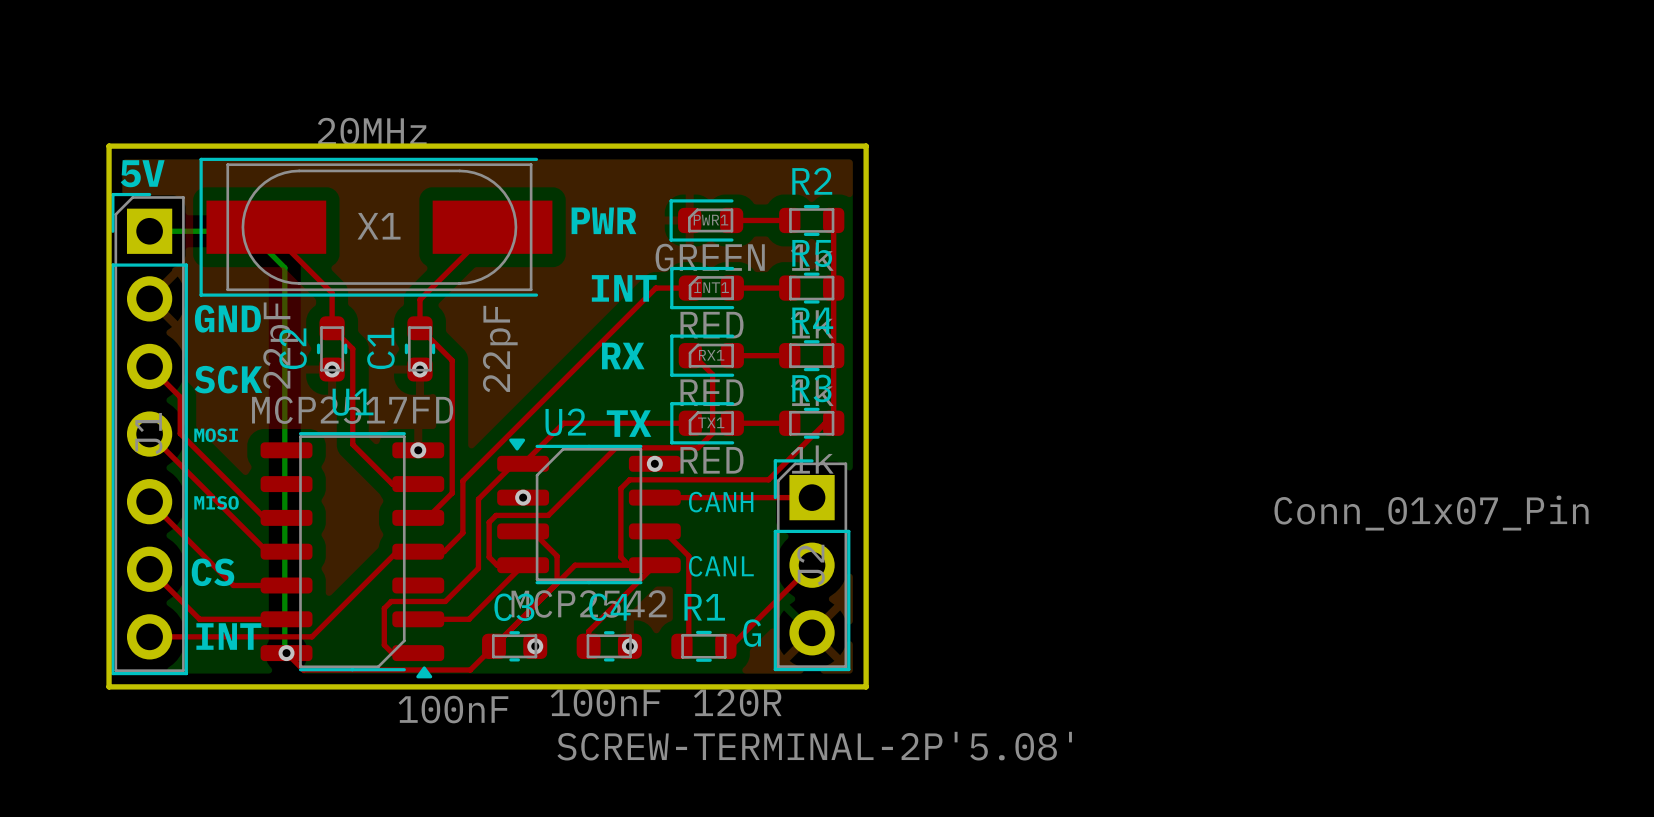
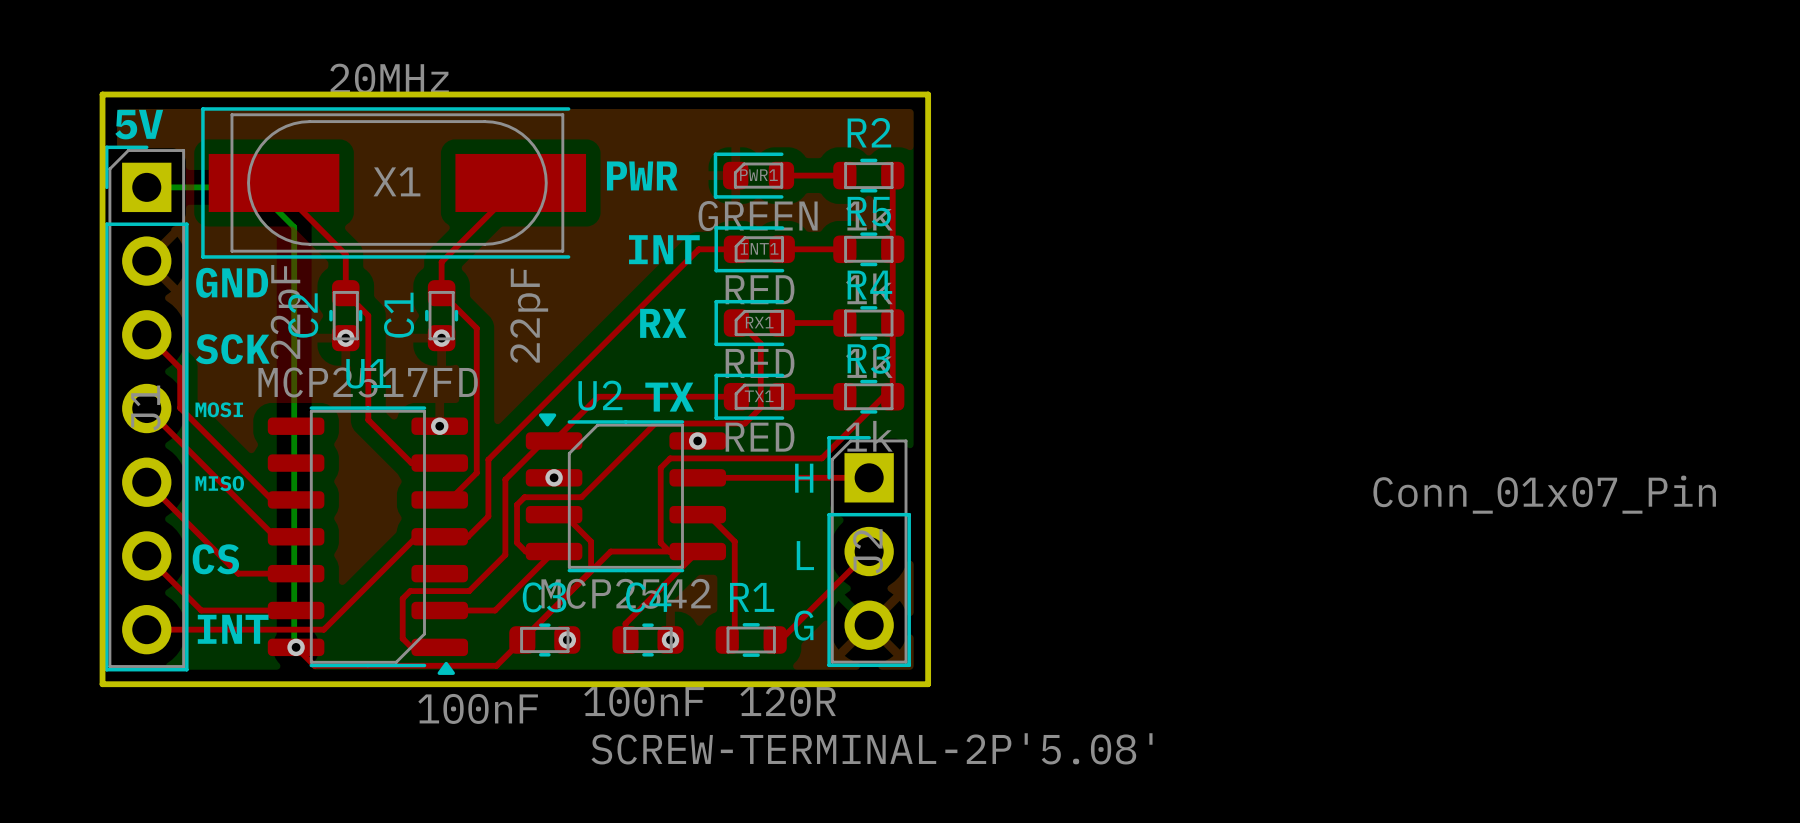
text: none -> H (804, 478)
text: CANH (721, 502) -> none
text: CANL (721, 566) -> none
text: none -> L (805, 555)

